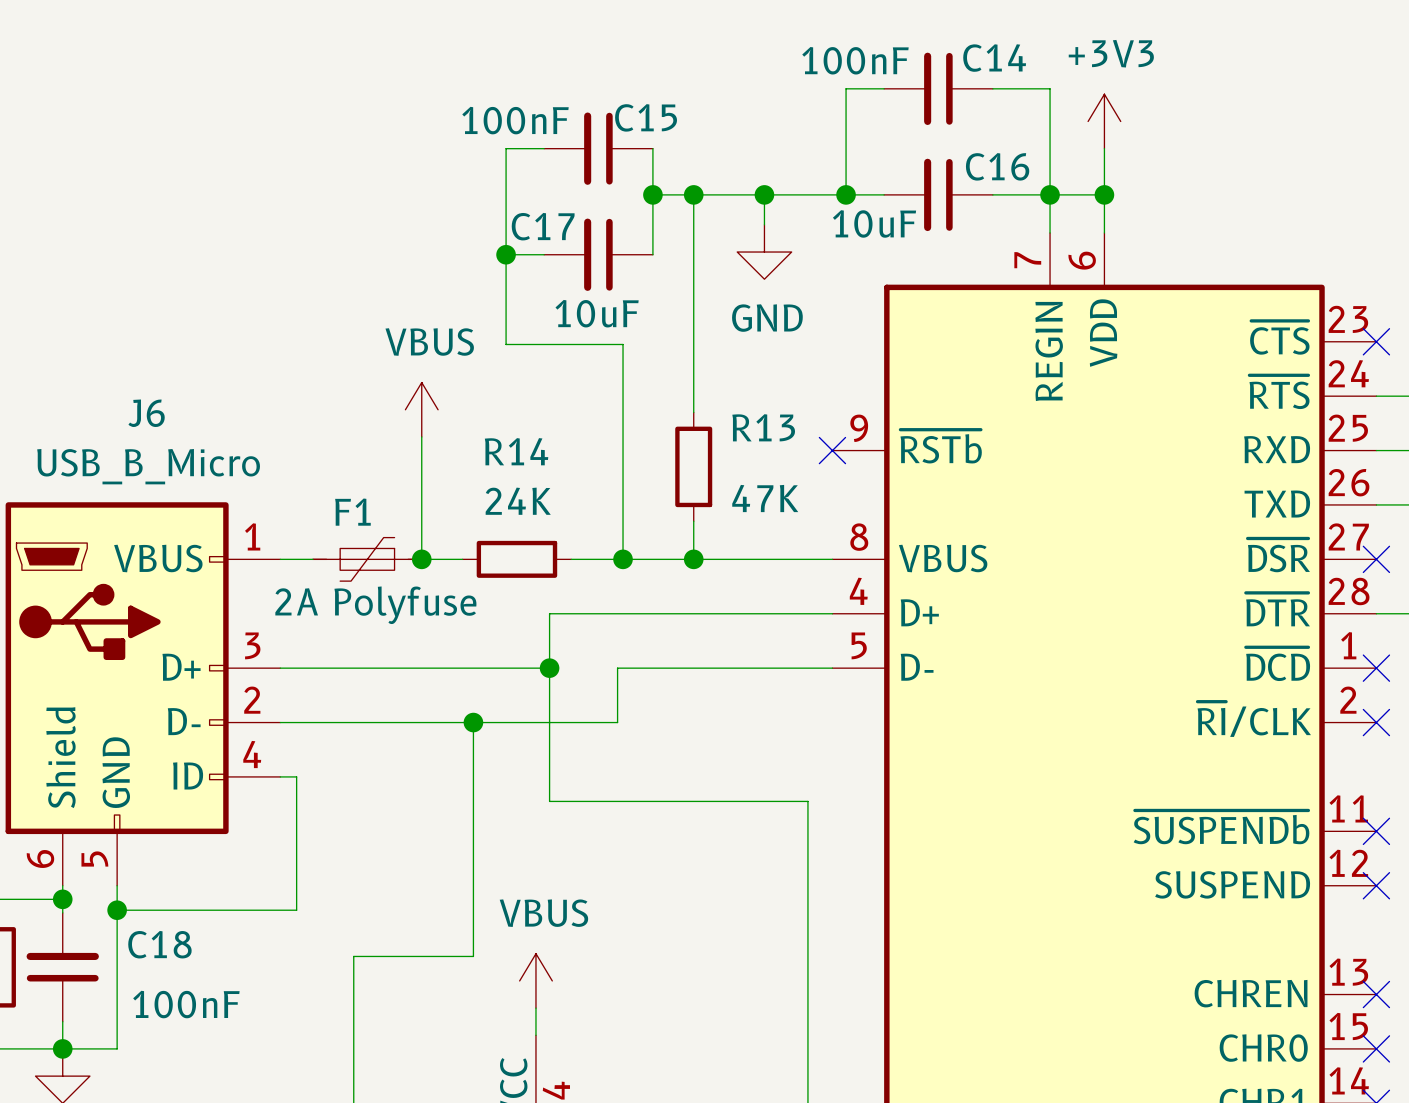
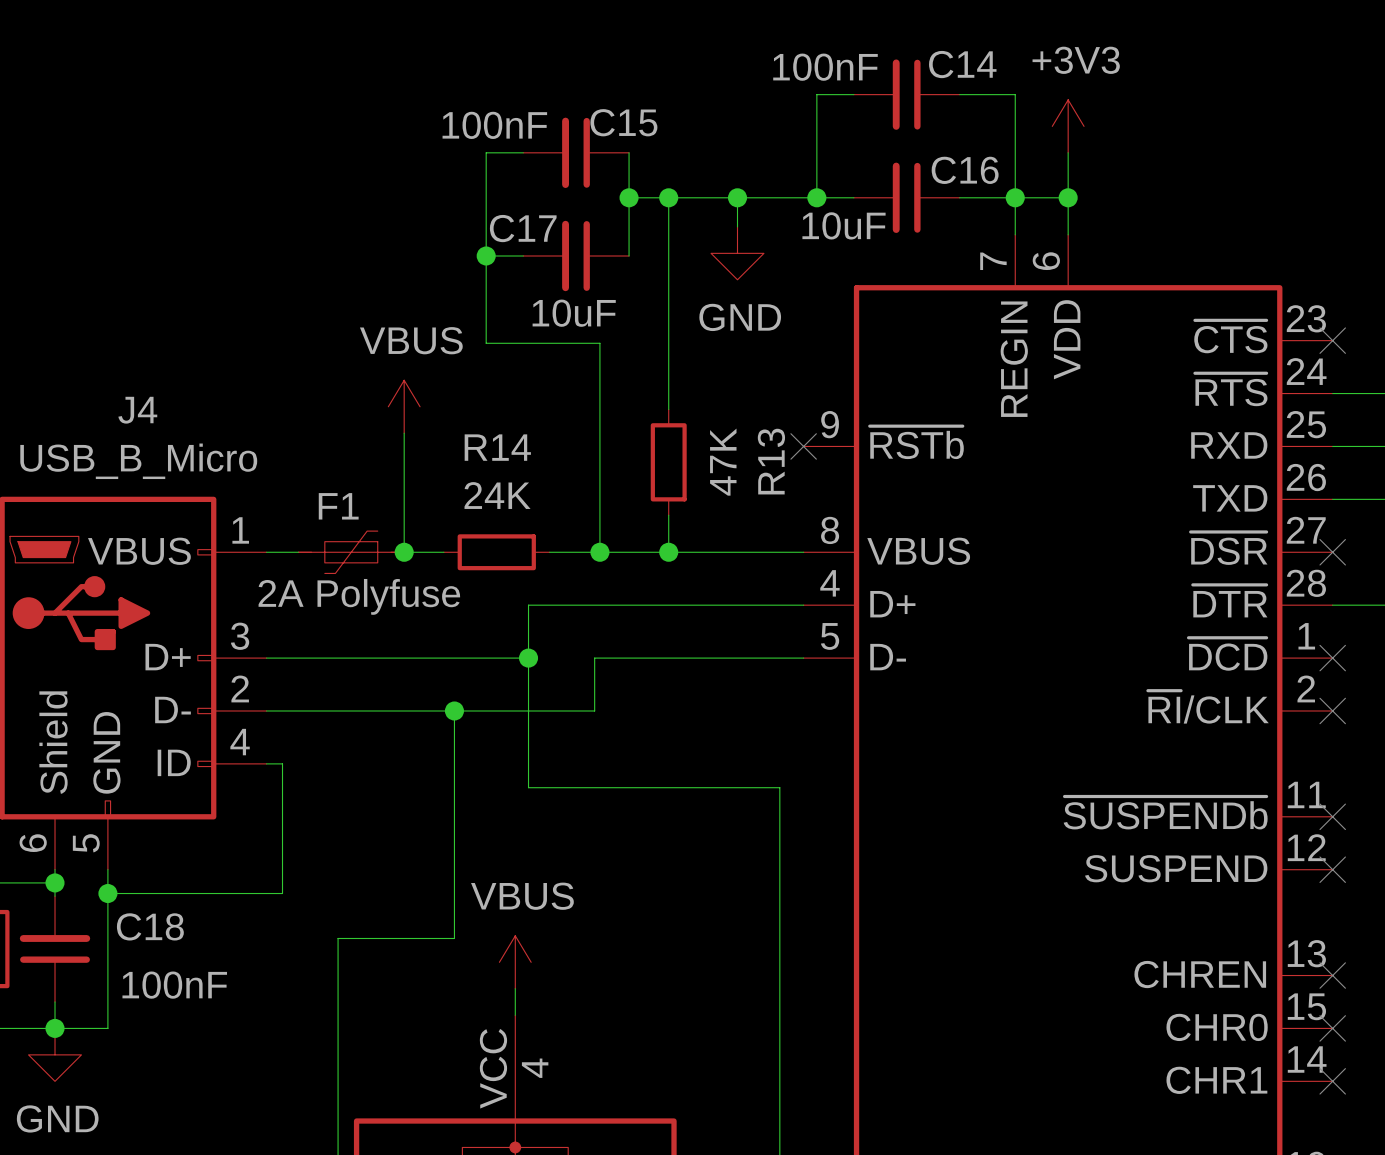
J6 name: J6 (146, 413) -> J4 (137, 410)
R13 name rotation: 0° (763, 427) -> 90° counterclockwise (771, 461)
R13 value rotation: 0° (765, 498) -> 90° counterclockwise (723, 462)

